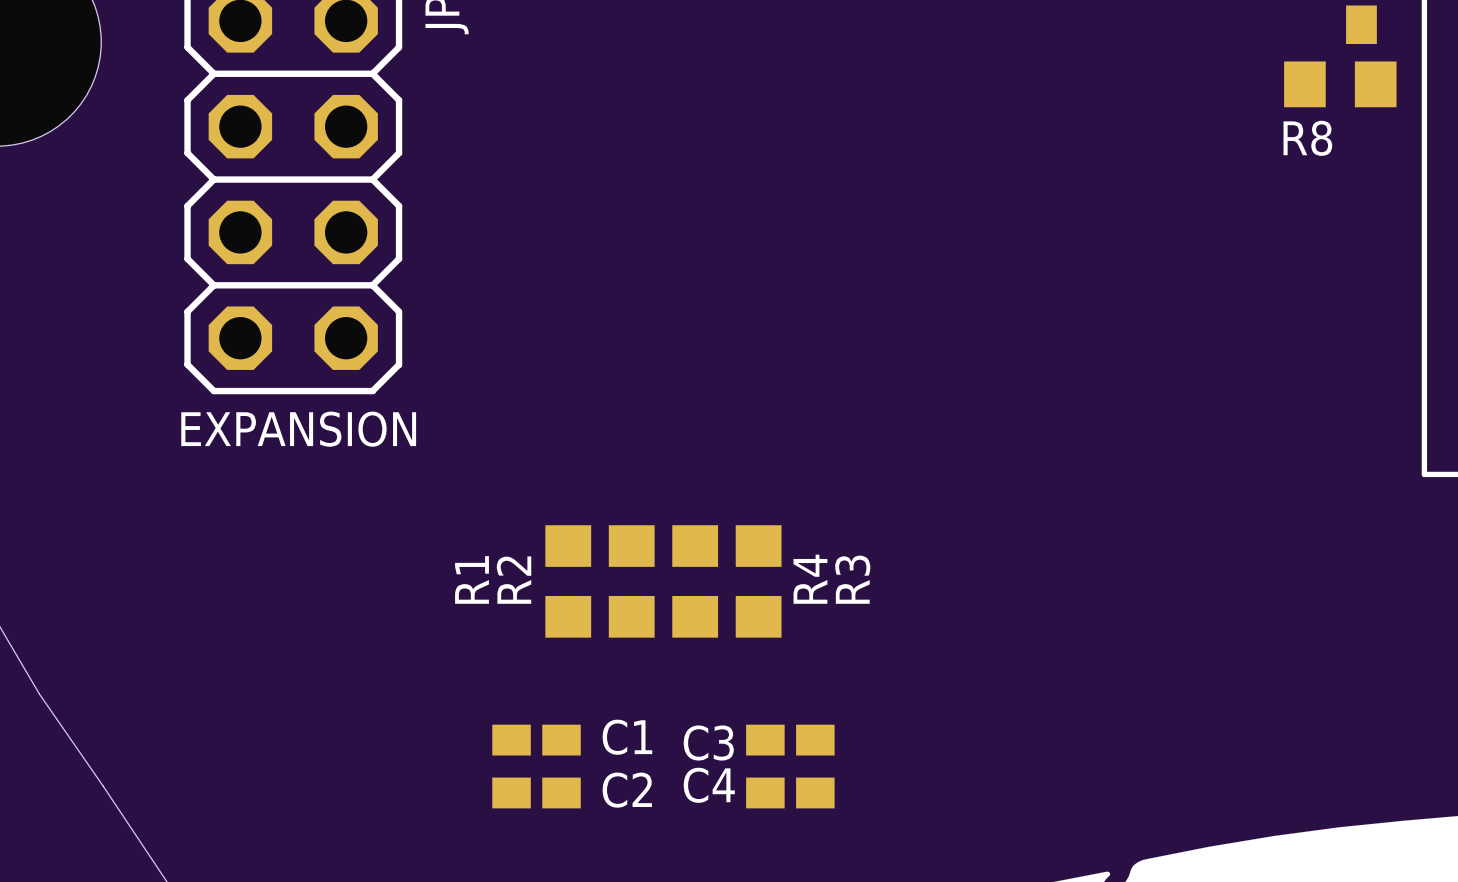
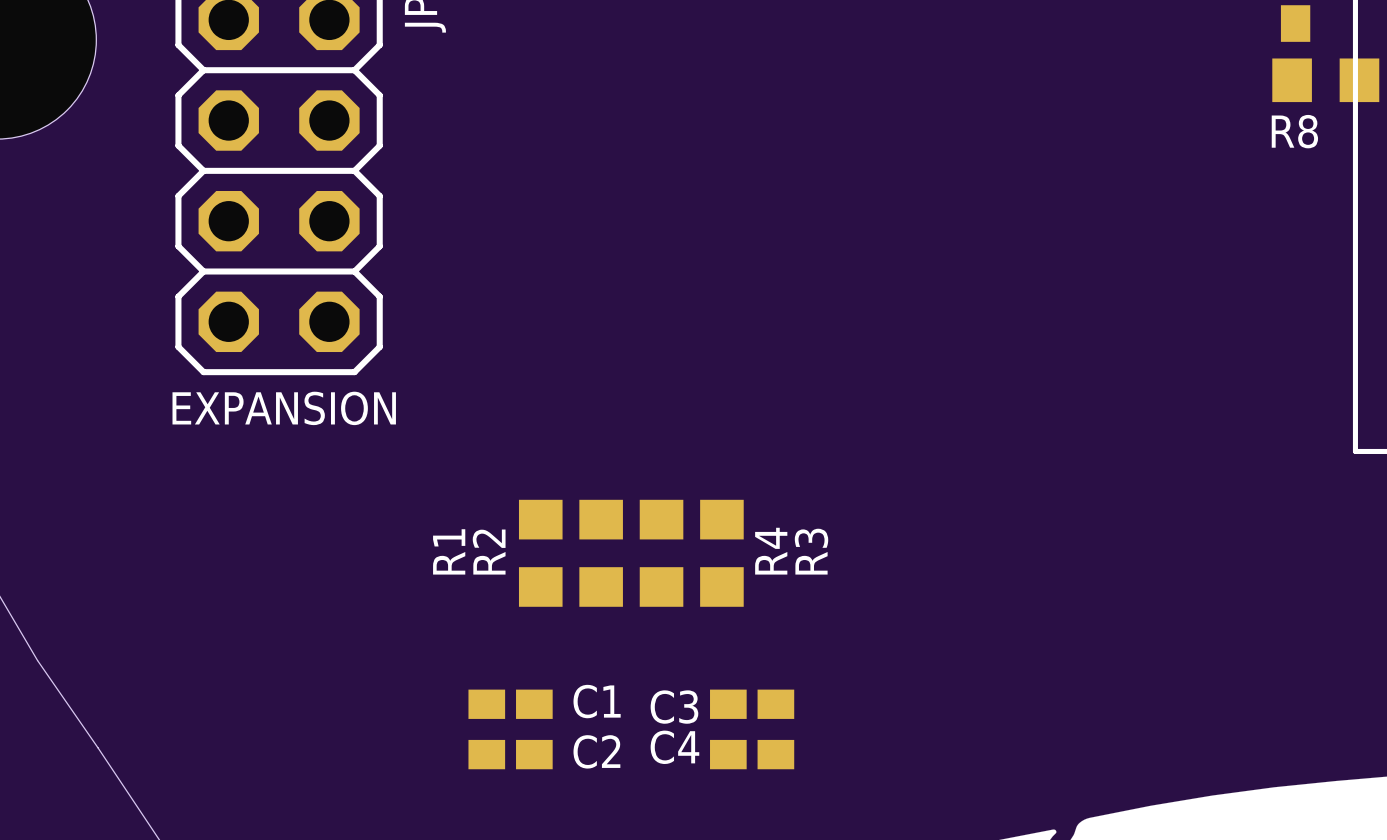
R8 position: (1340, 84) -> (1325, 80)

